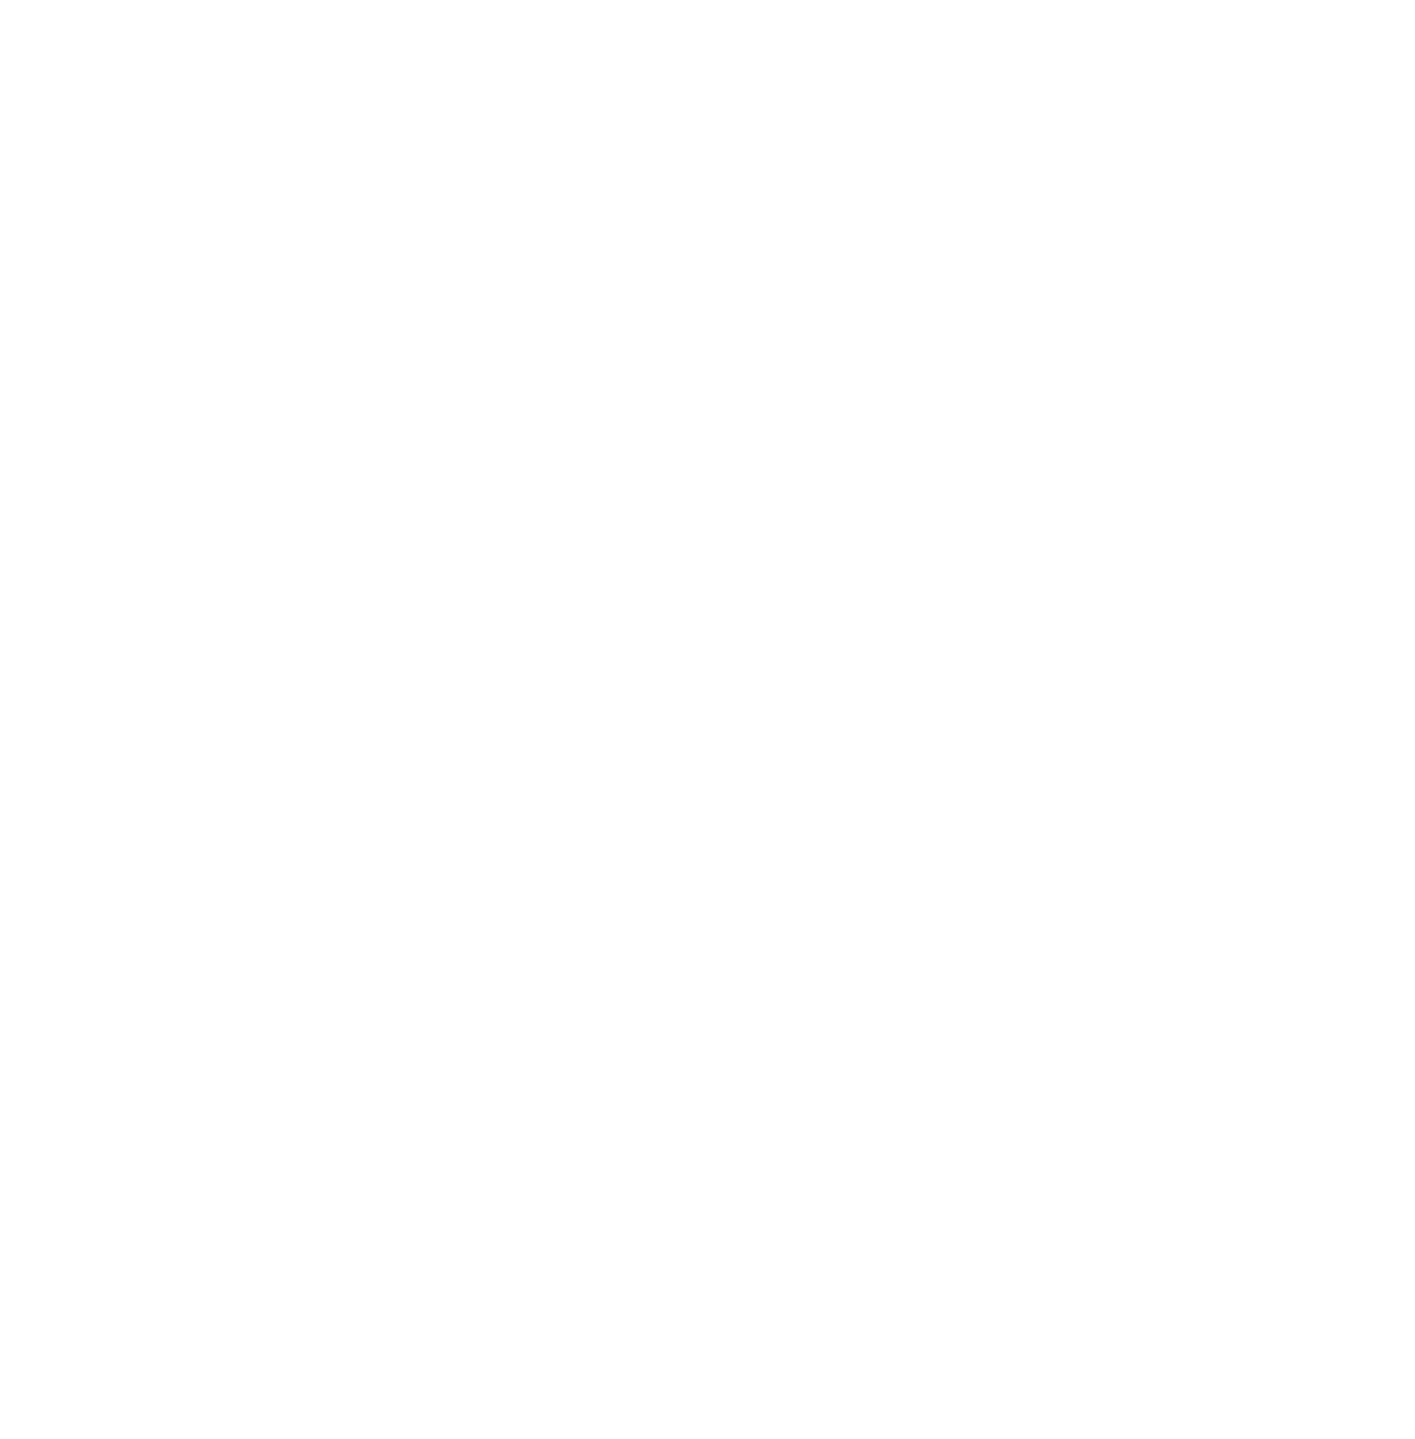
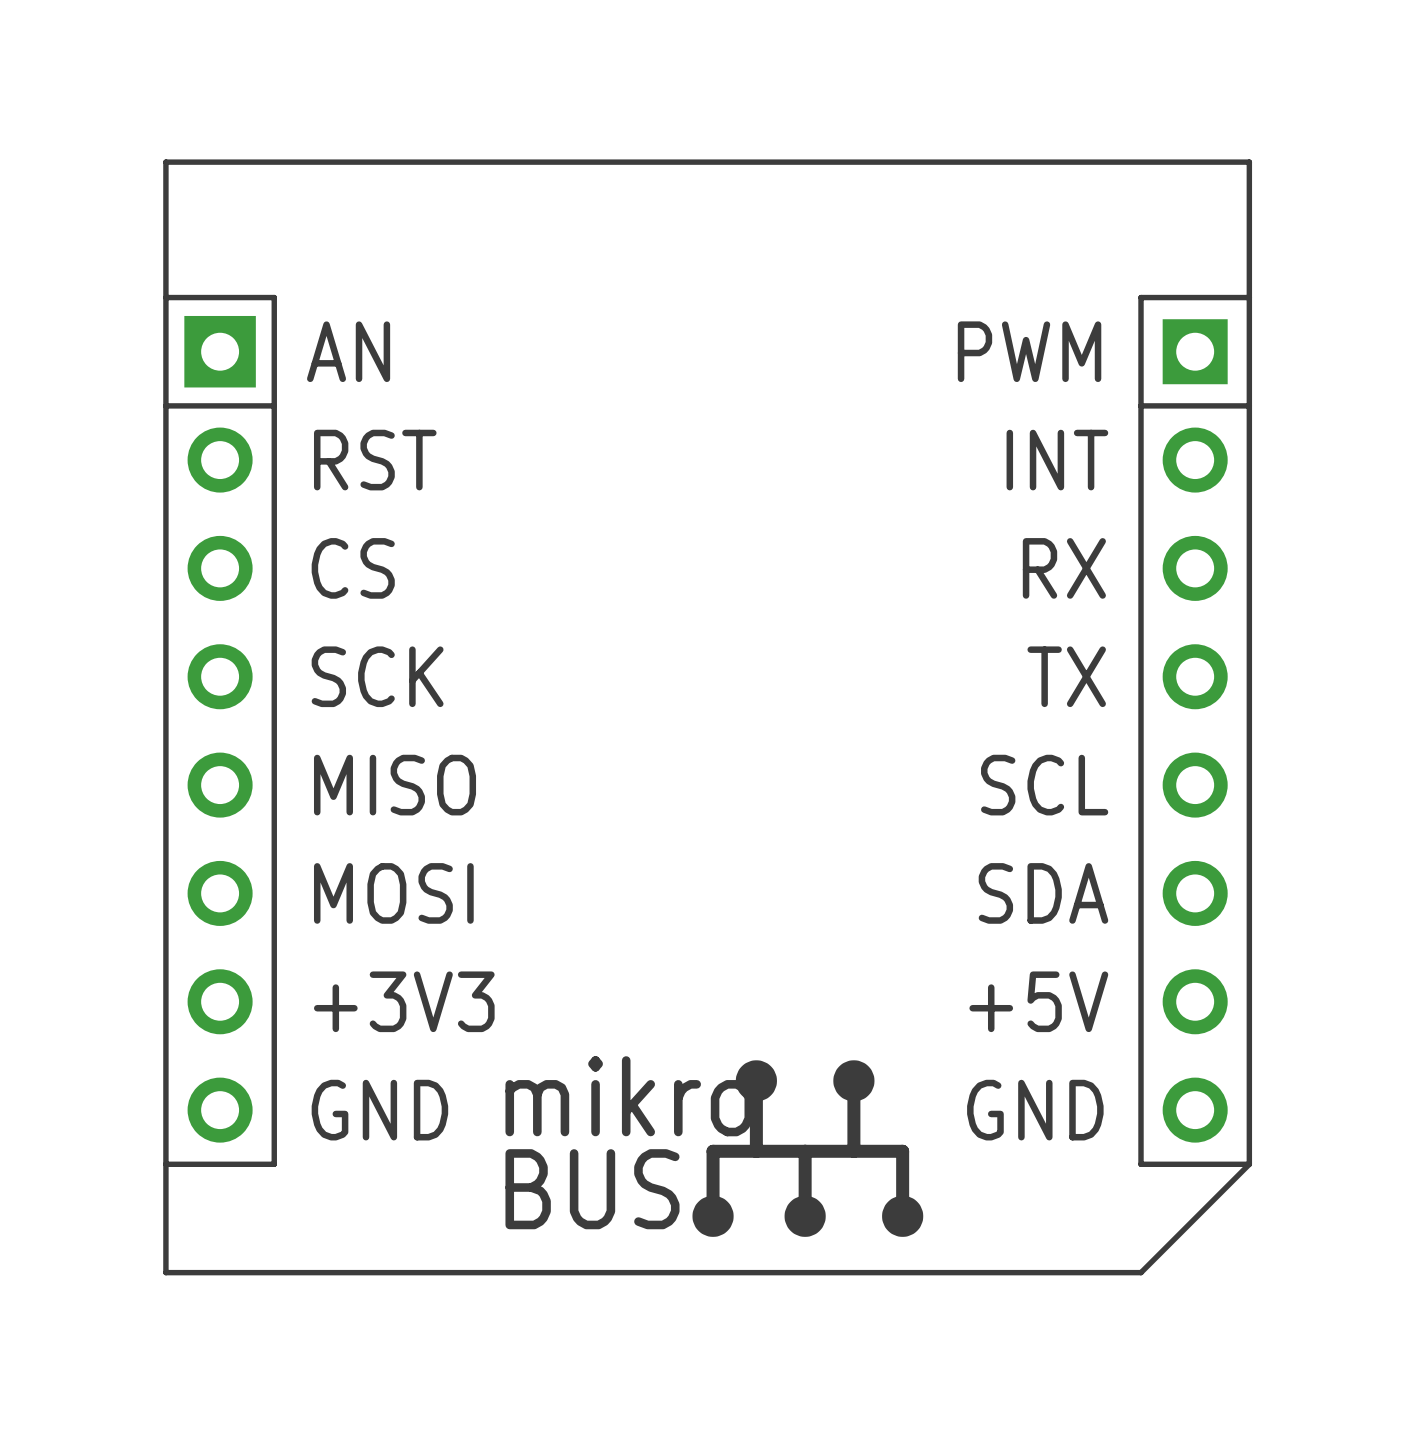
part: none -> (707, 717)

